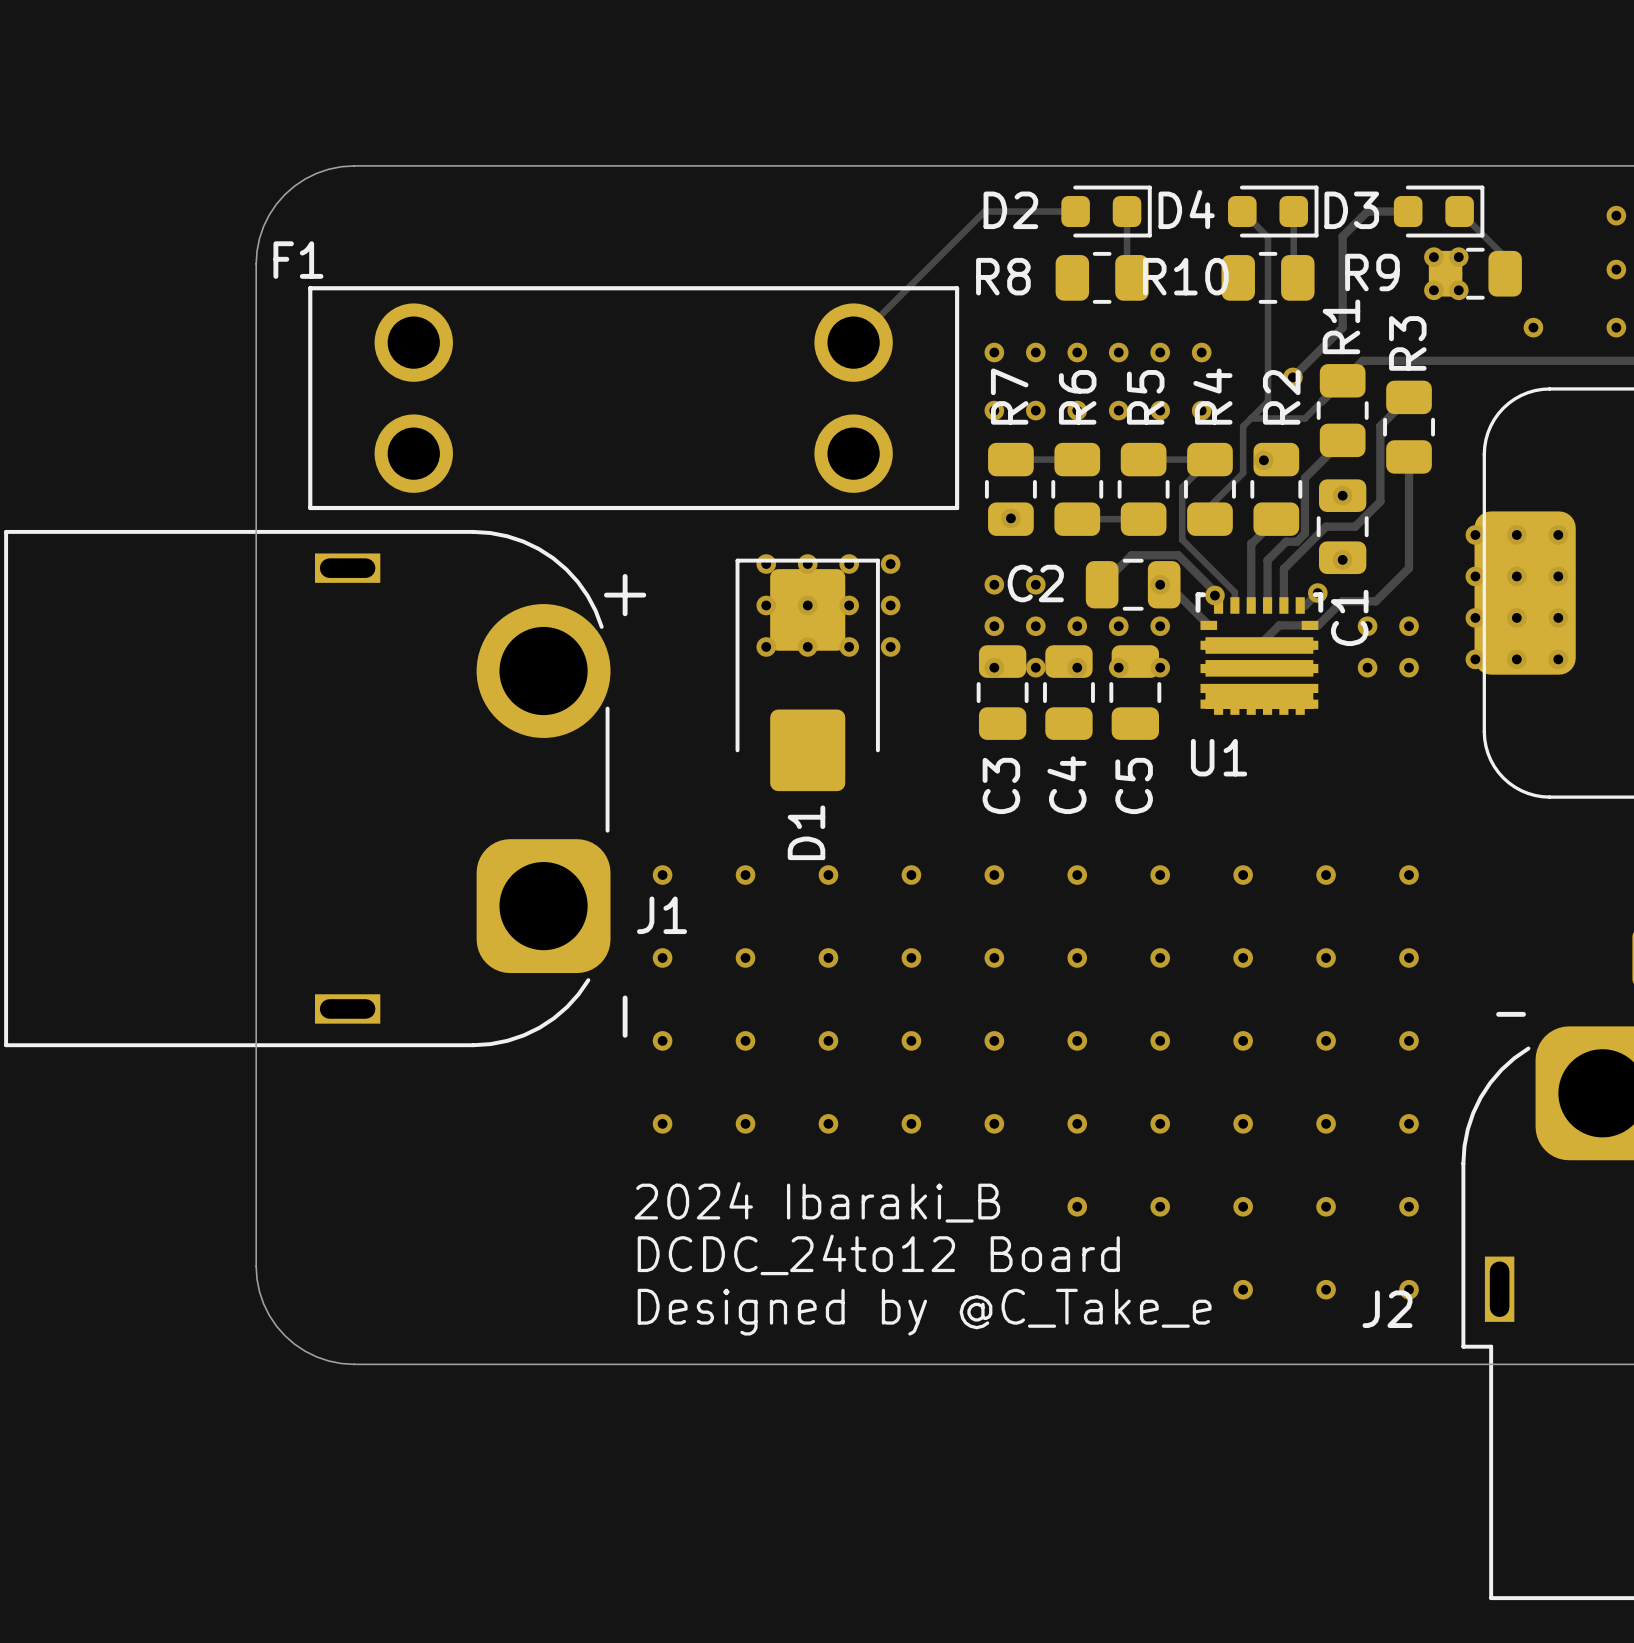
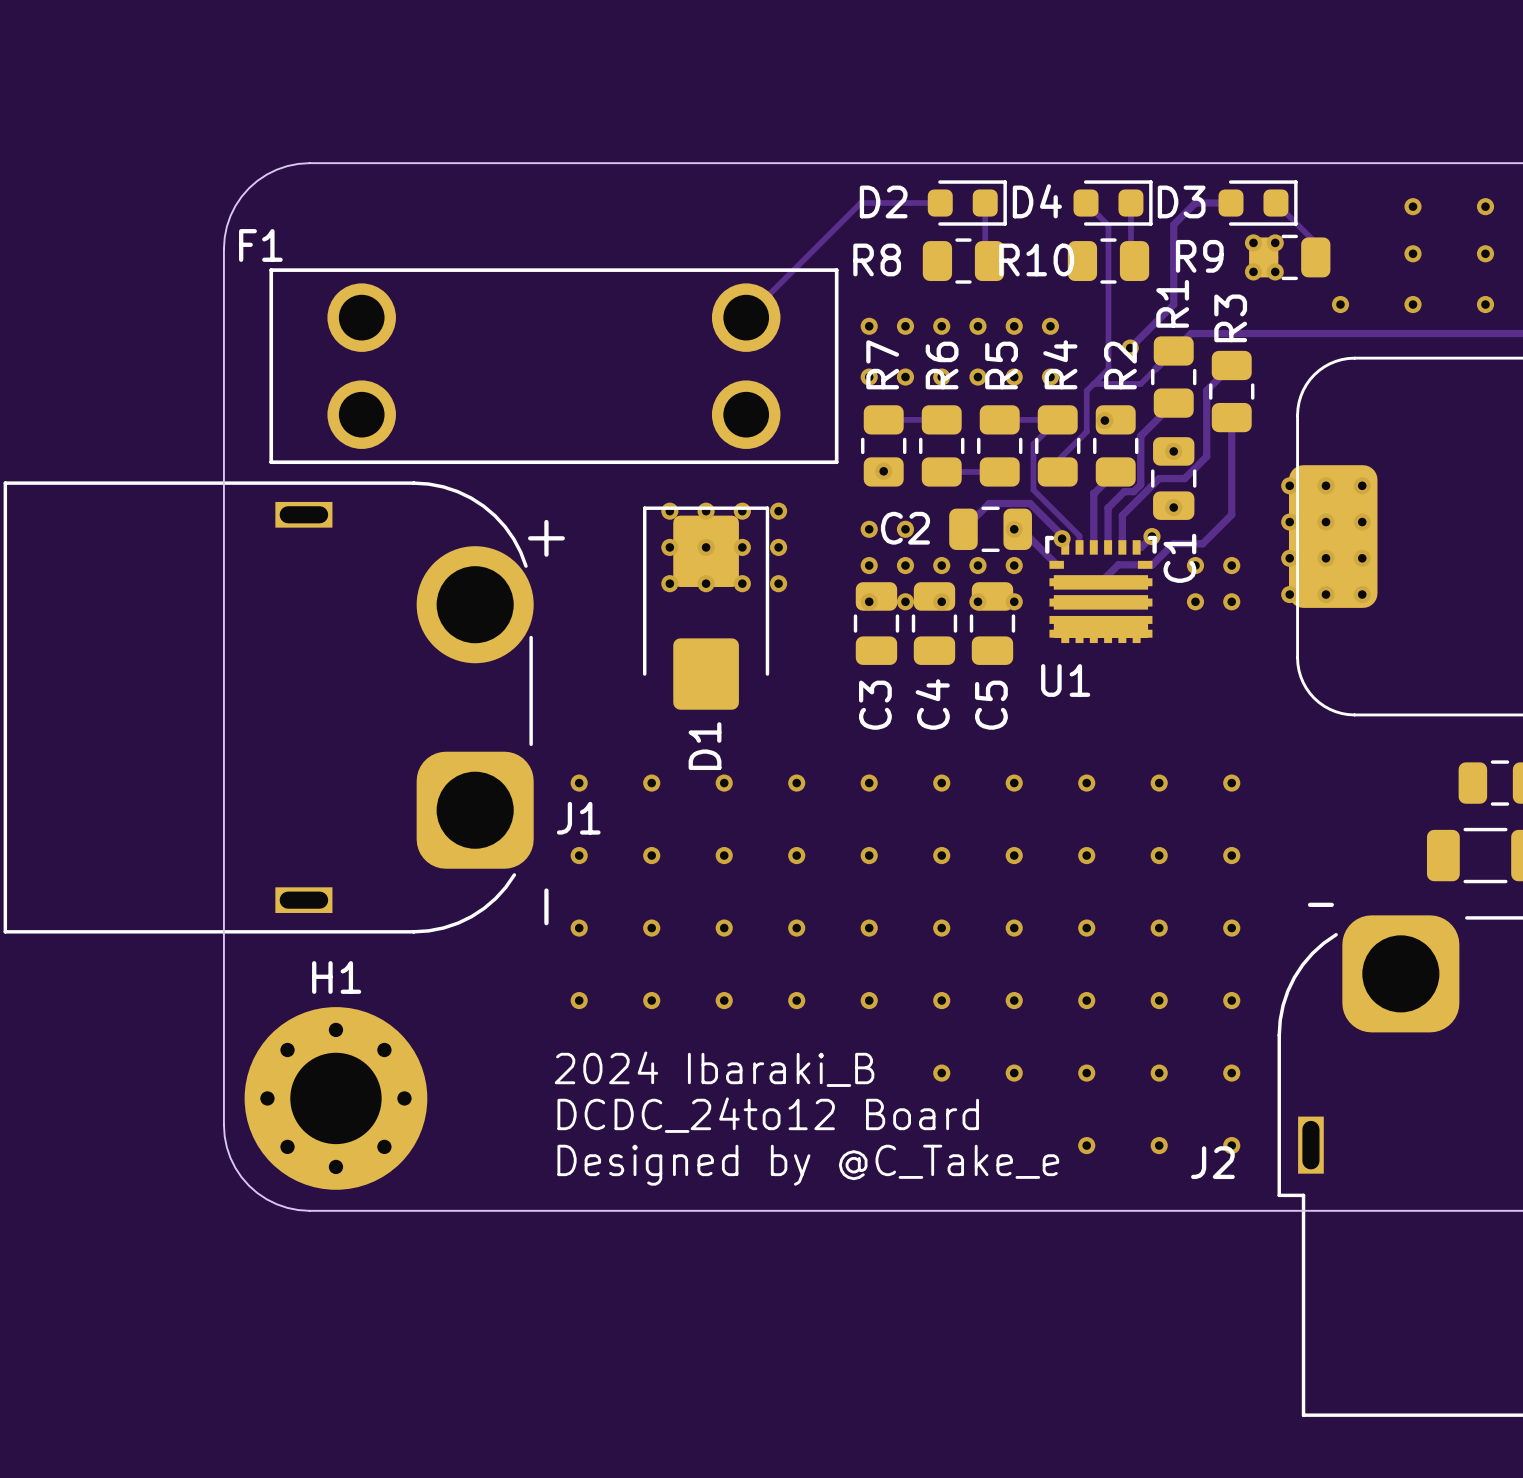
H1: none -> (335, 1098)

